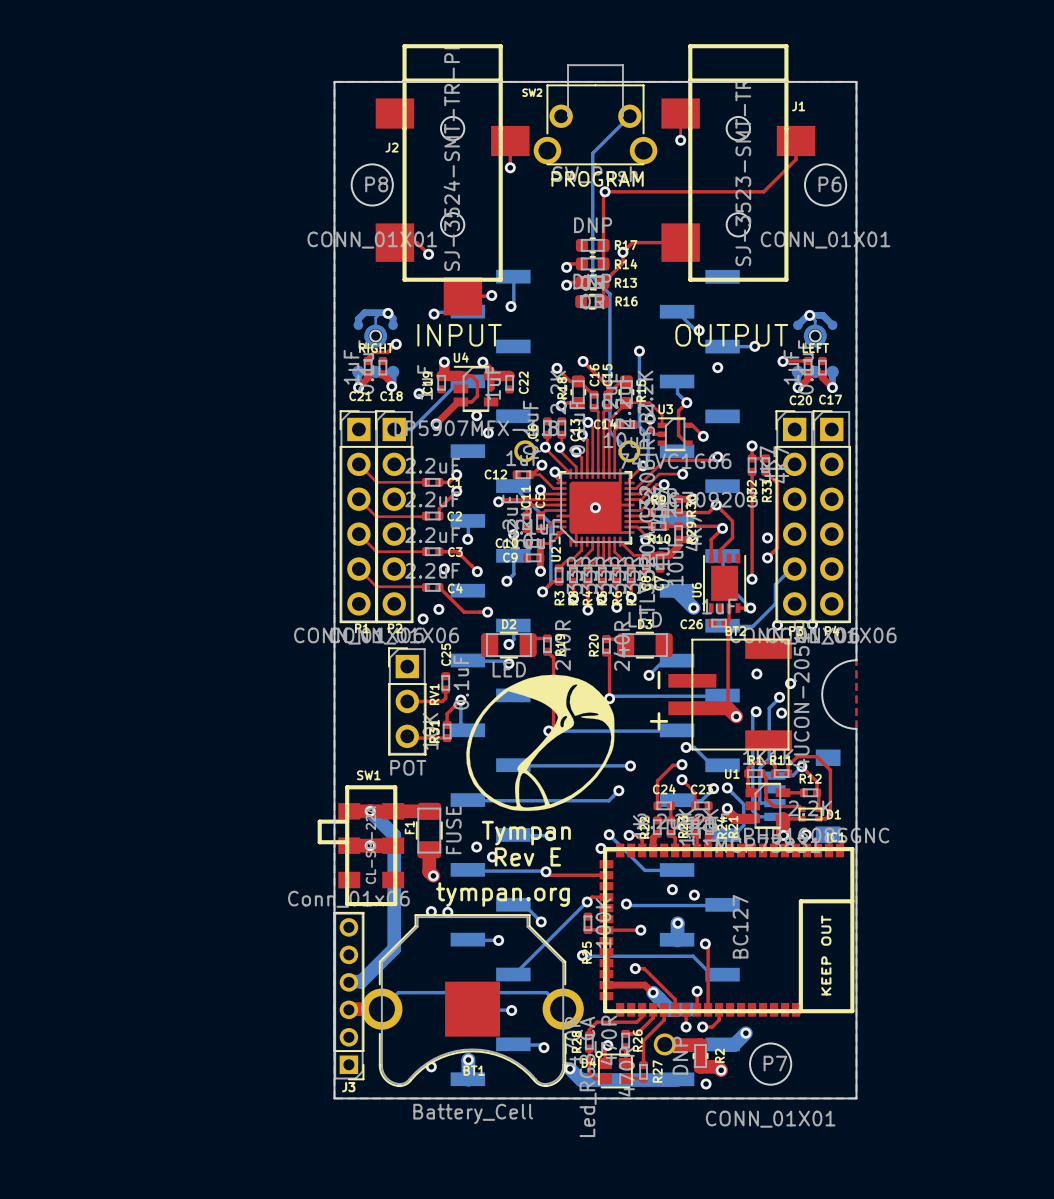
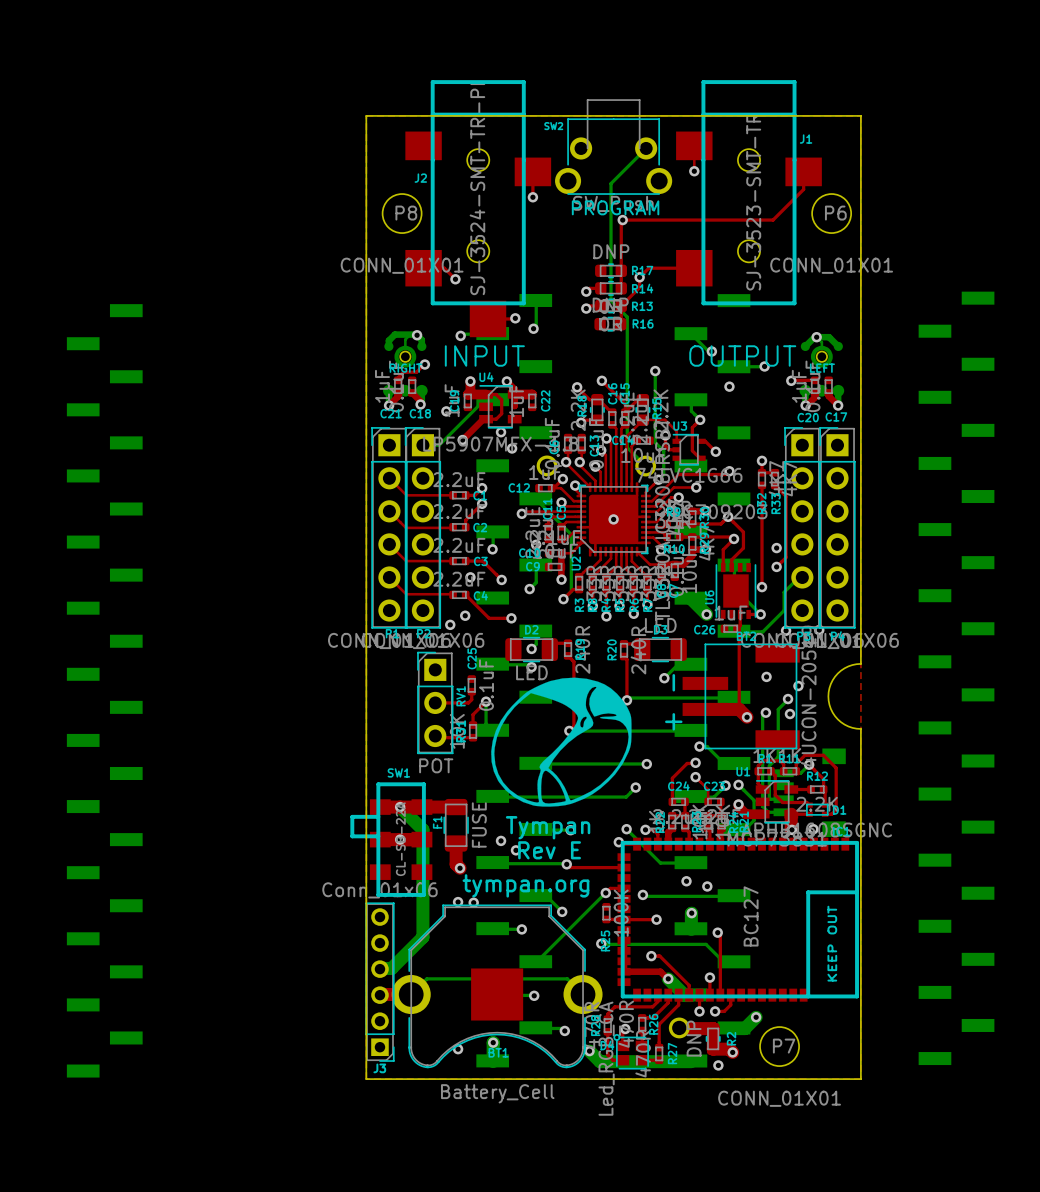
part: none -> (956, 678)
part: none -> (104, 690)

